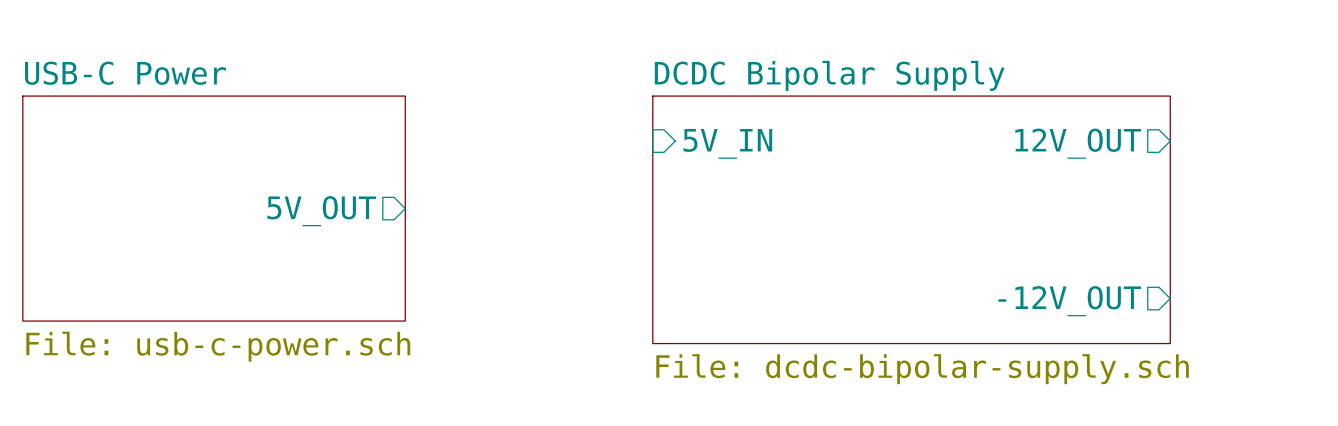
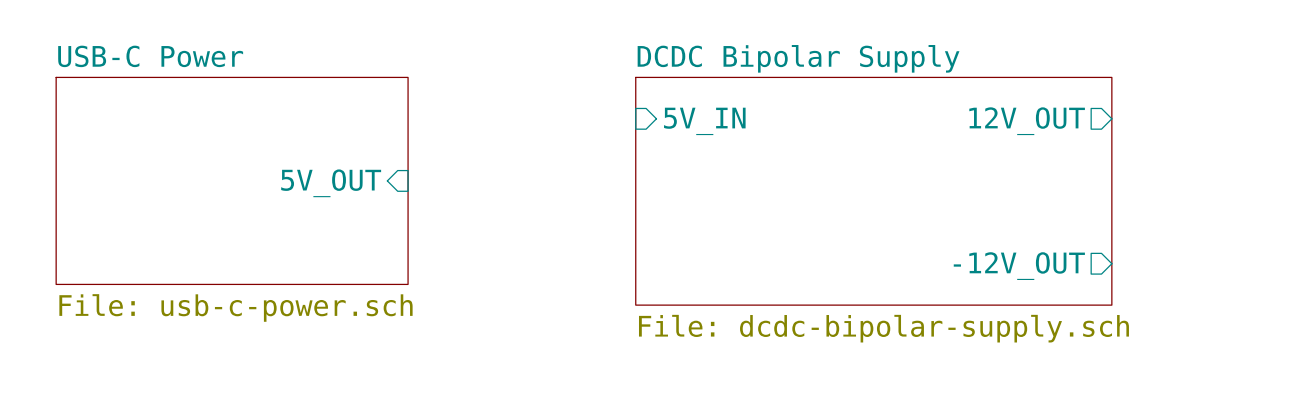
sheet pin shape: output (321, 211) -> input (331, 183)

